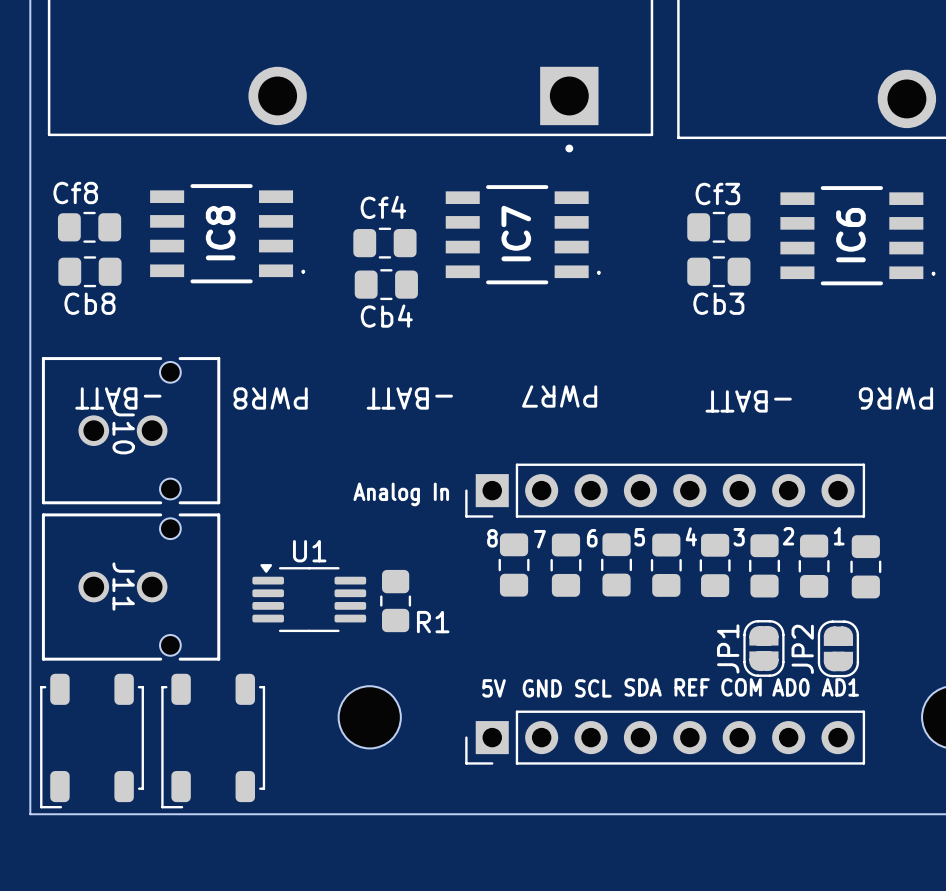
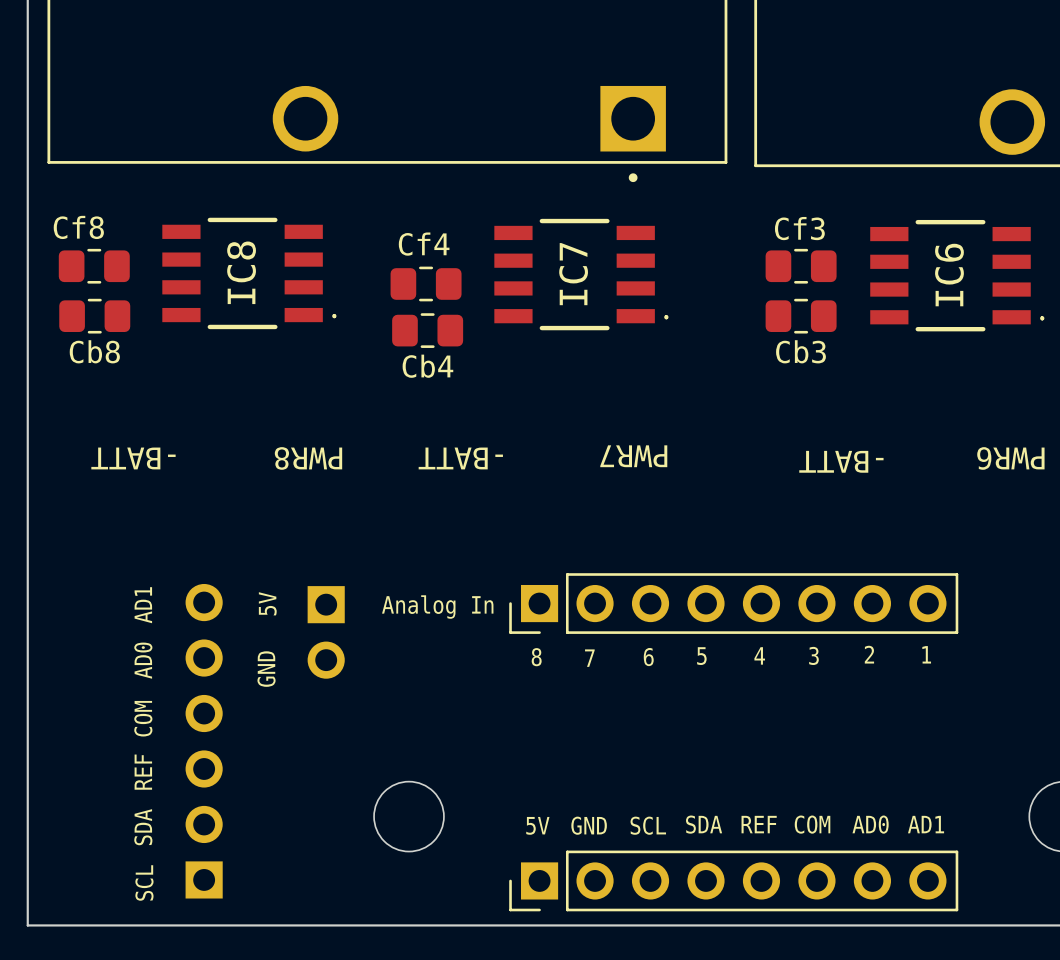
J10: (131, 430) -> none
part position: (665, 490) -> (733, 603)
text position: Analog In (401, 494) -> Analog In (437, 607)
text: none -> 5V (267, 603)
text: none -> AD1 (143, 605)
text position: 4 (691, 536) -> 4 (759, 655)
text position: 2 (788, 536) -> 2 (869, 654)
text position: 1 (839, 536) -> 1 (926, 654)
text position: 5 (639, 537) -> 5 (701, 656)
text position: 3 (739, 537) -> 3 (813, 655)
text position: 8 (492, 538) -> 8 (536, 657)
text position: 6 (592, 538) -> 6 (648, 657)
text position: 7 (539, 539) -> 7 (589, 658)
part: none -> (326, 632)
part: (616, 564) -> none
part: (514, 565) -> none
part: (565, 565) -> none
part: (666, 565) -> none
part: (715, 565) -> none
part: (764, 565) -> none
part: (814, 566) -> none
part: (865, 566) -> none
text: none -> AD0 (143, 660)
text: none -> GND (266, 669)
J11: (131, 587) -> none
U1: (309, 598) -> none
R1: (395, 601) -> none
text: none -> COM (143, 718)
JP1: (763, 648) -> none
JP2: (838, 648) -> none
part: none -> (204, 741)
text: none -> REF (143, 772)
text position: SDA (643, 687) -> SDA (704, 824)
text position: REF (692, 687) -> REF (759, 824)
text position: COM (741, 687) -> COM (812, 824)
text position: AD0 (790, 687) -> AD0 (870, 824)
text position: AD1 (840, 687) -> AD1 (926, 824)
text position: 5V (494, 688) -> 5V (537, 825)
text position: GND (542, 688) -> GND (589, 825)
text position: SCL (593, 688) -> SCL (648, 825)
text: none -> SDA (143, 827)
part position: (665, 737) -> (733, 880)
part: (92, 741) -> none
part: (213, 741) -> none
text: none -> SCL (144, 882)

